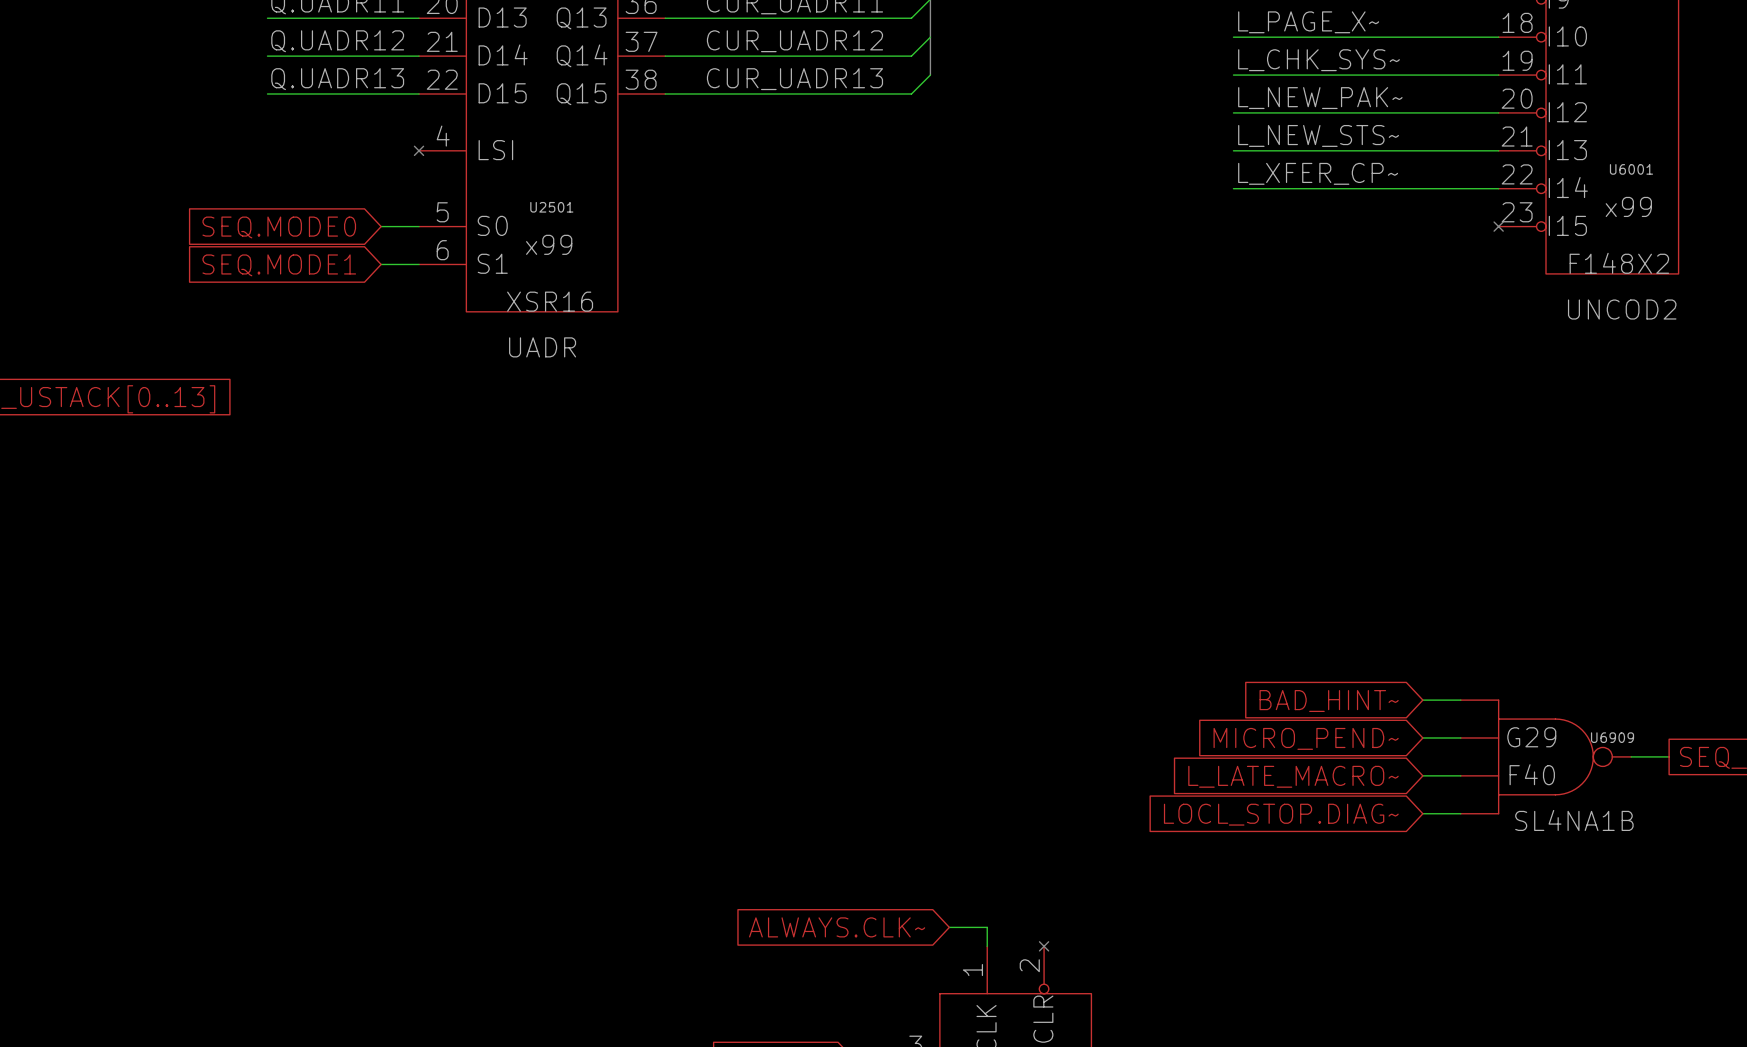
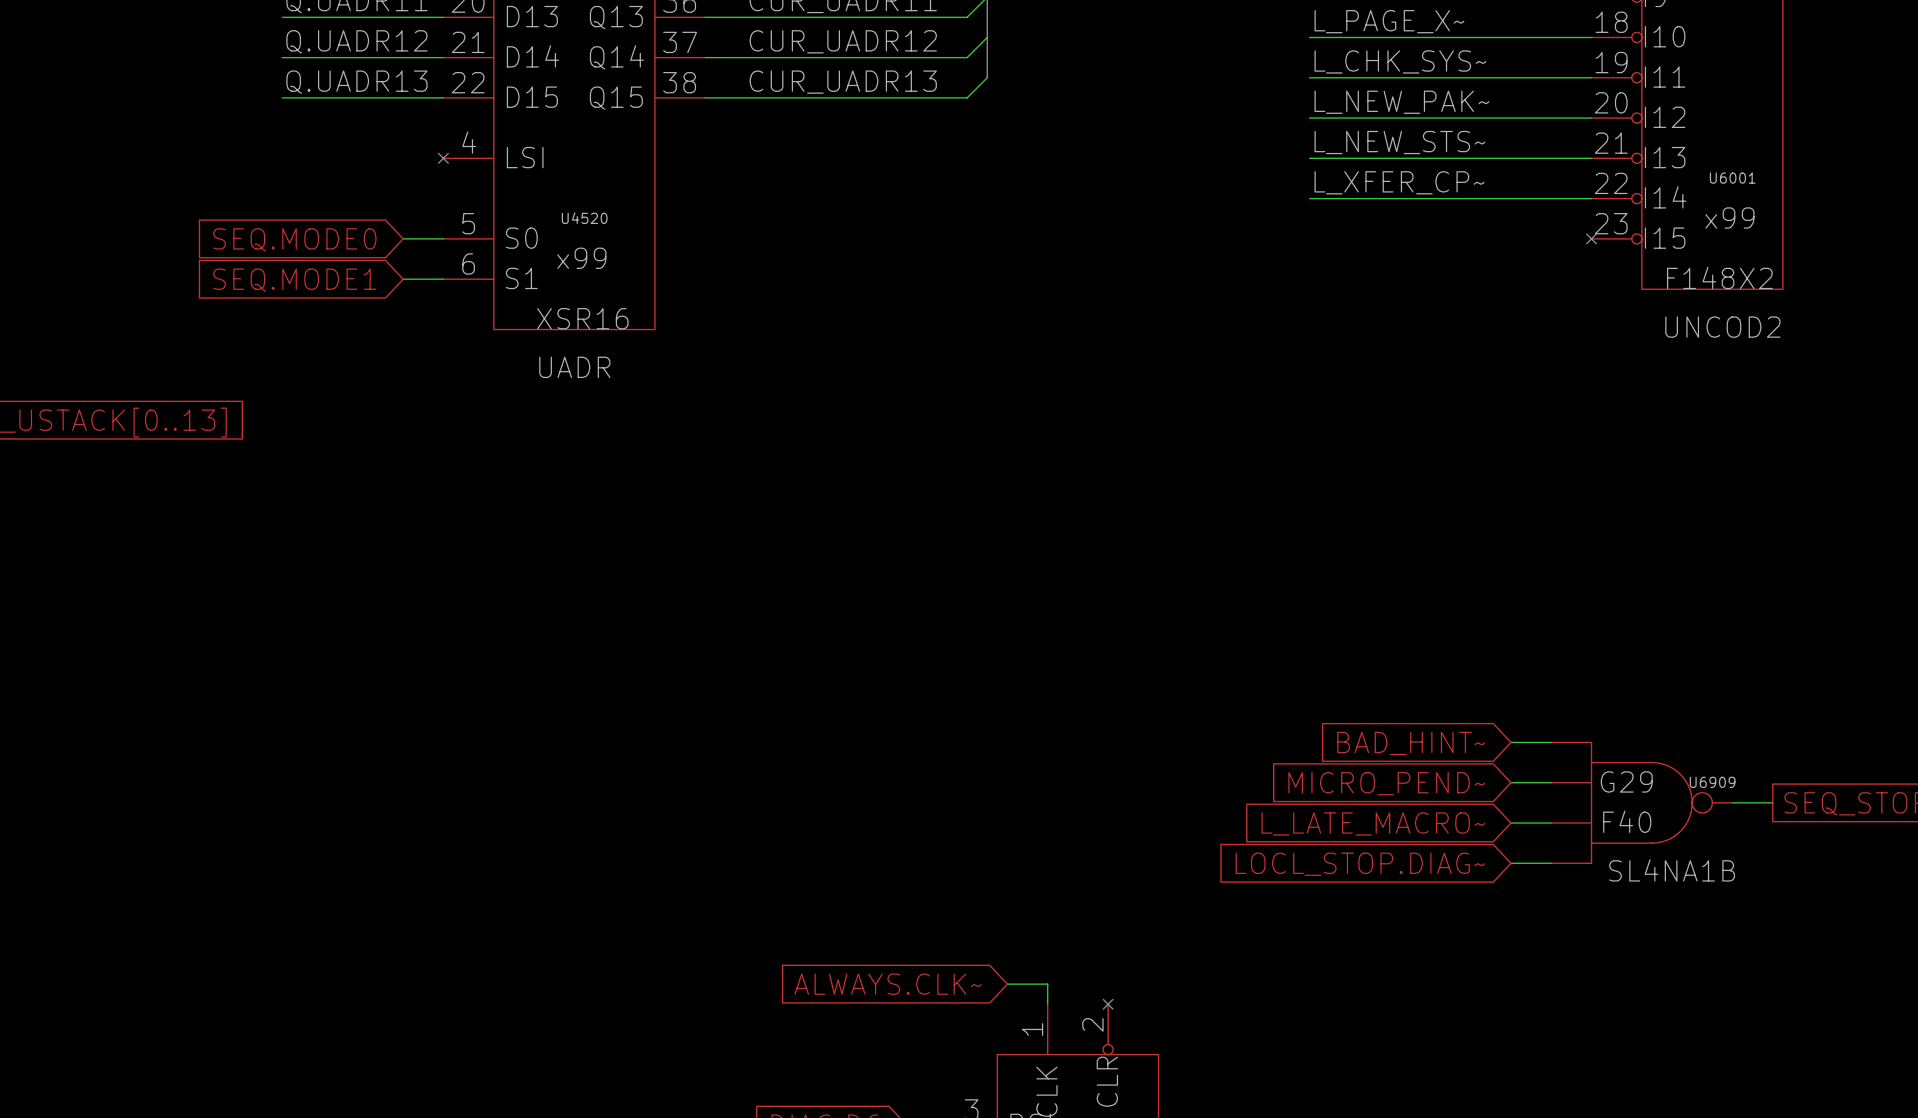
U2501 name: U2501 (551, 207) -> U4520 (584, 218)

